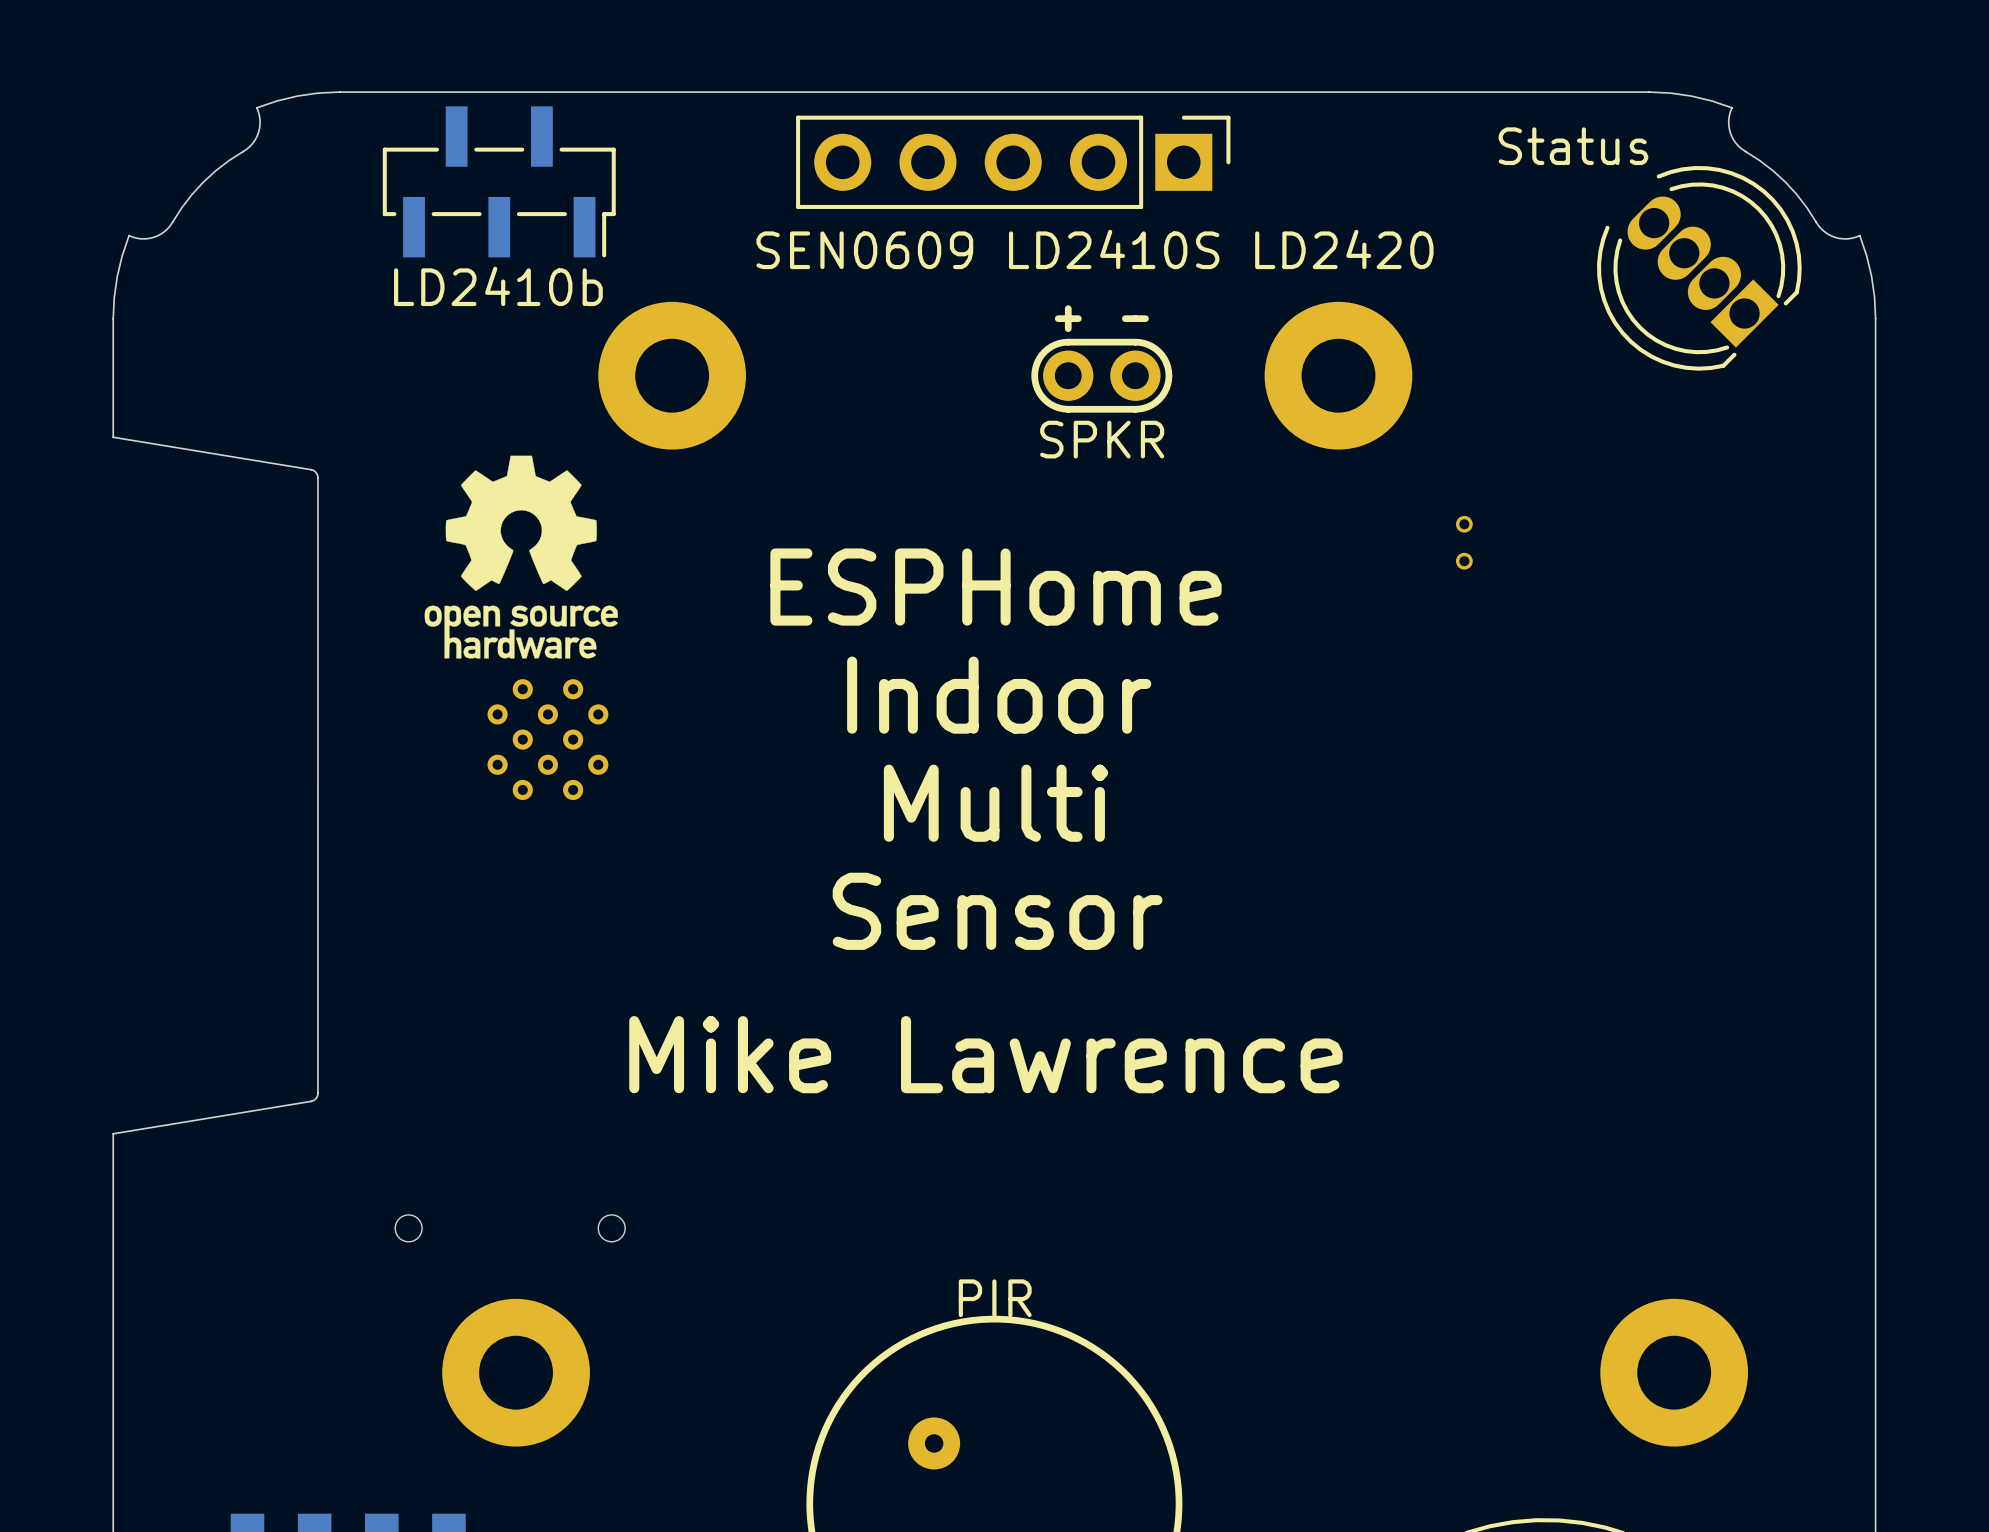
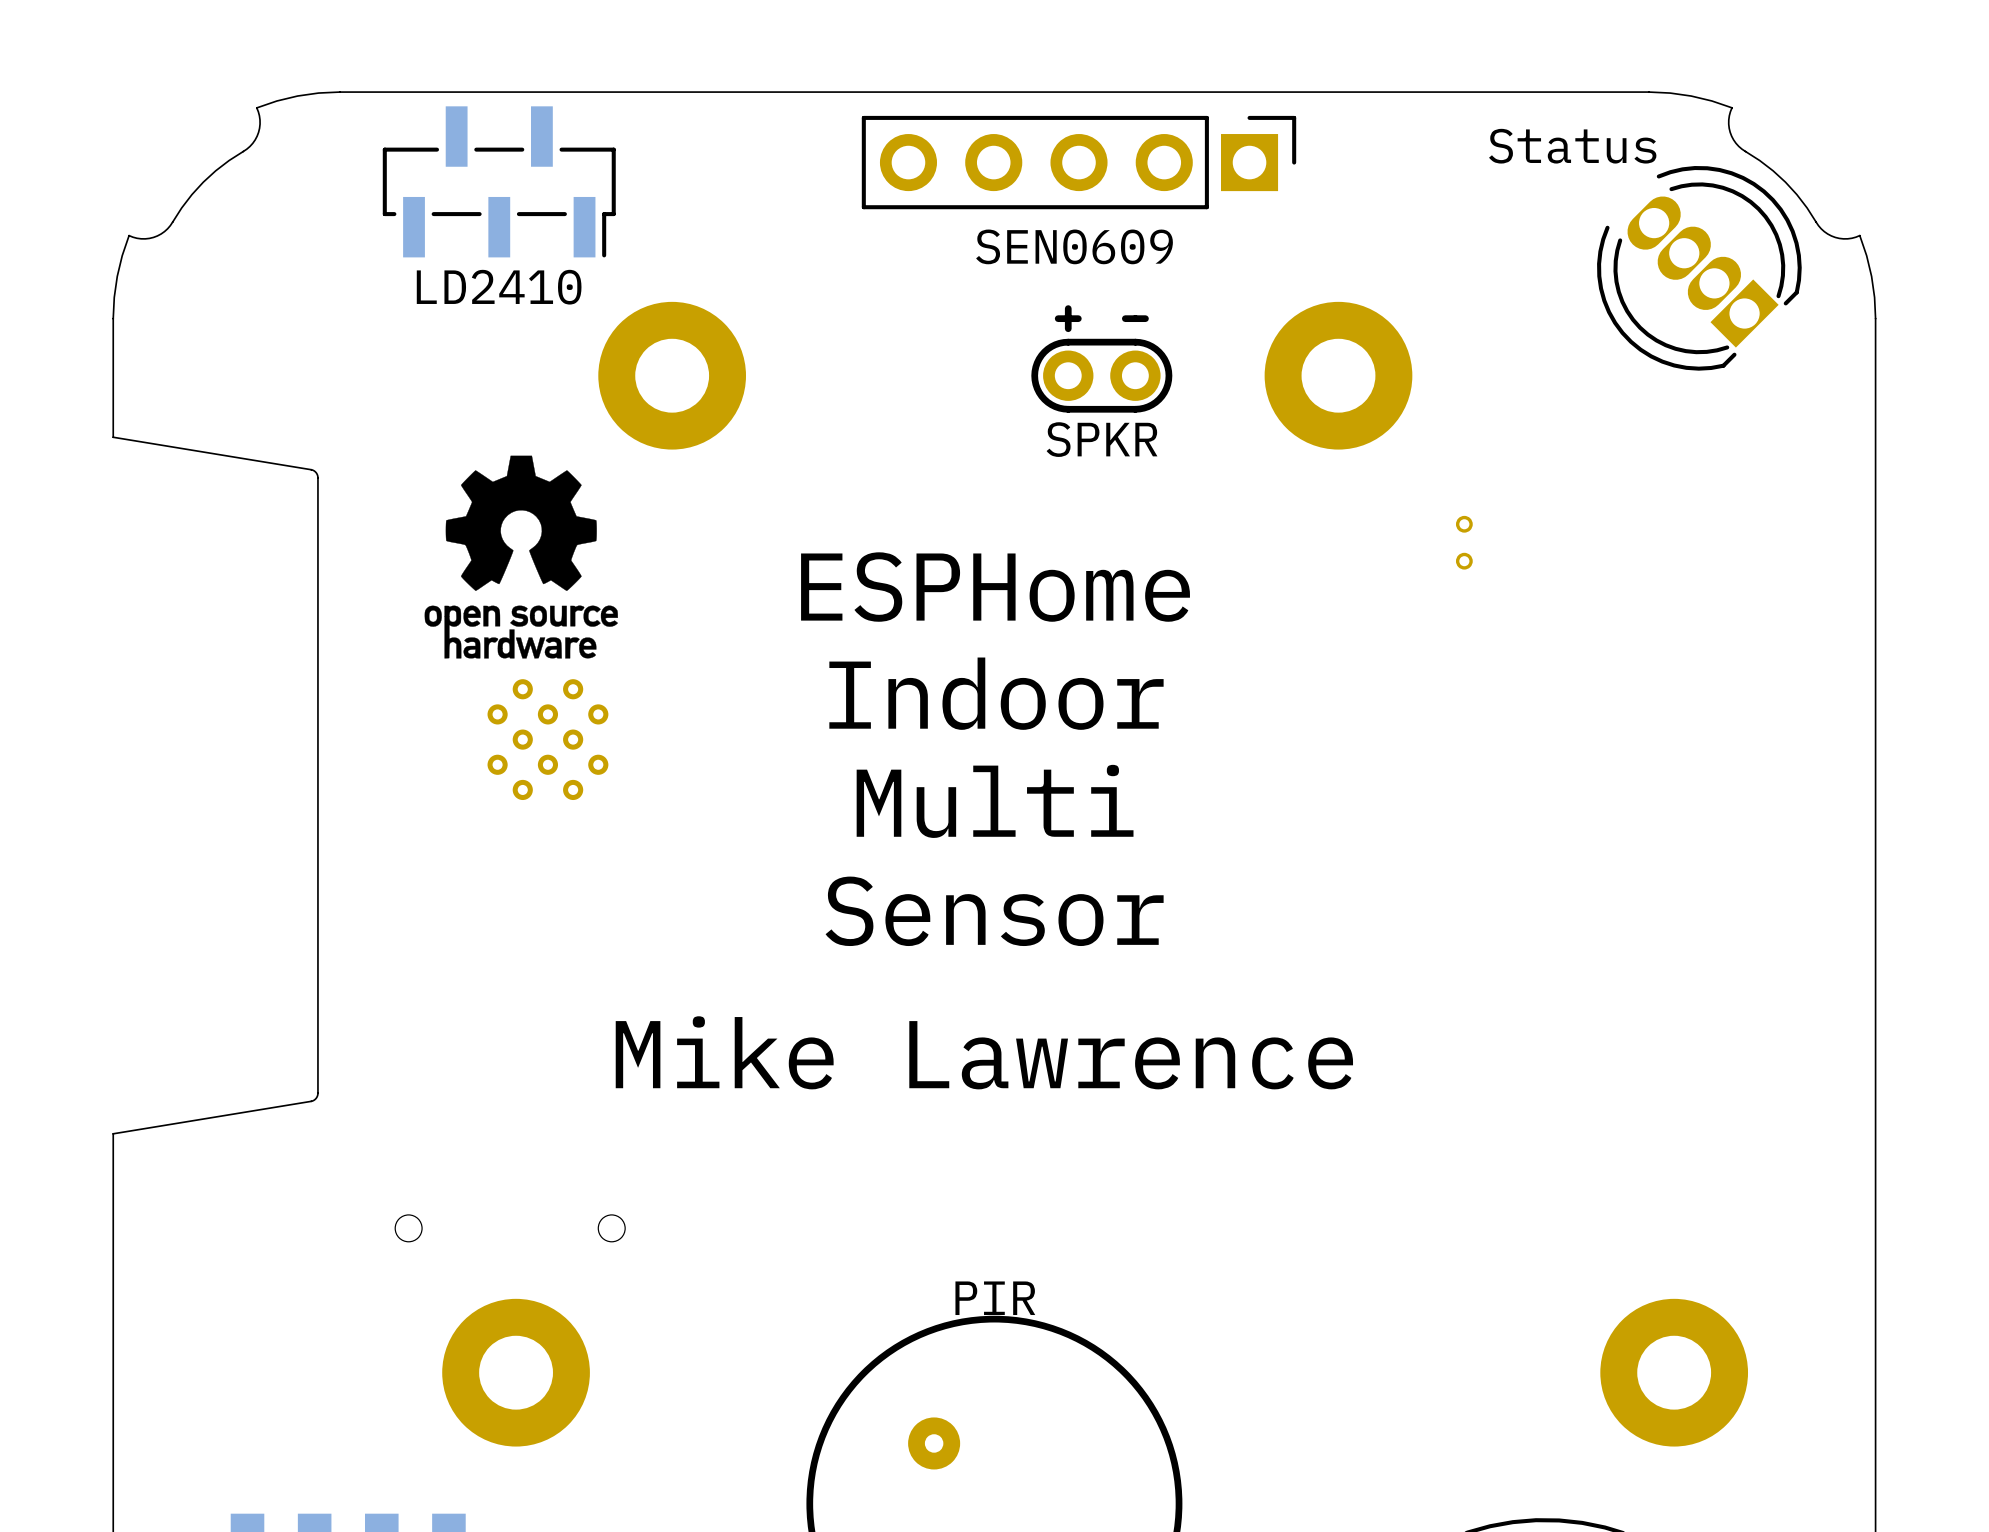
part position: (1013, 162) -> (1079, 162)
text: none -> SEN0609 (1074, 246)
text: SEN0609 LD2410S LD2420 (1095, 249) -> none
text: LD2410b (498, 286) -> LD2410 (499, 287)

